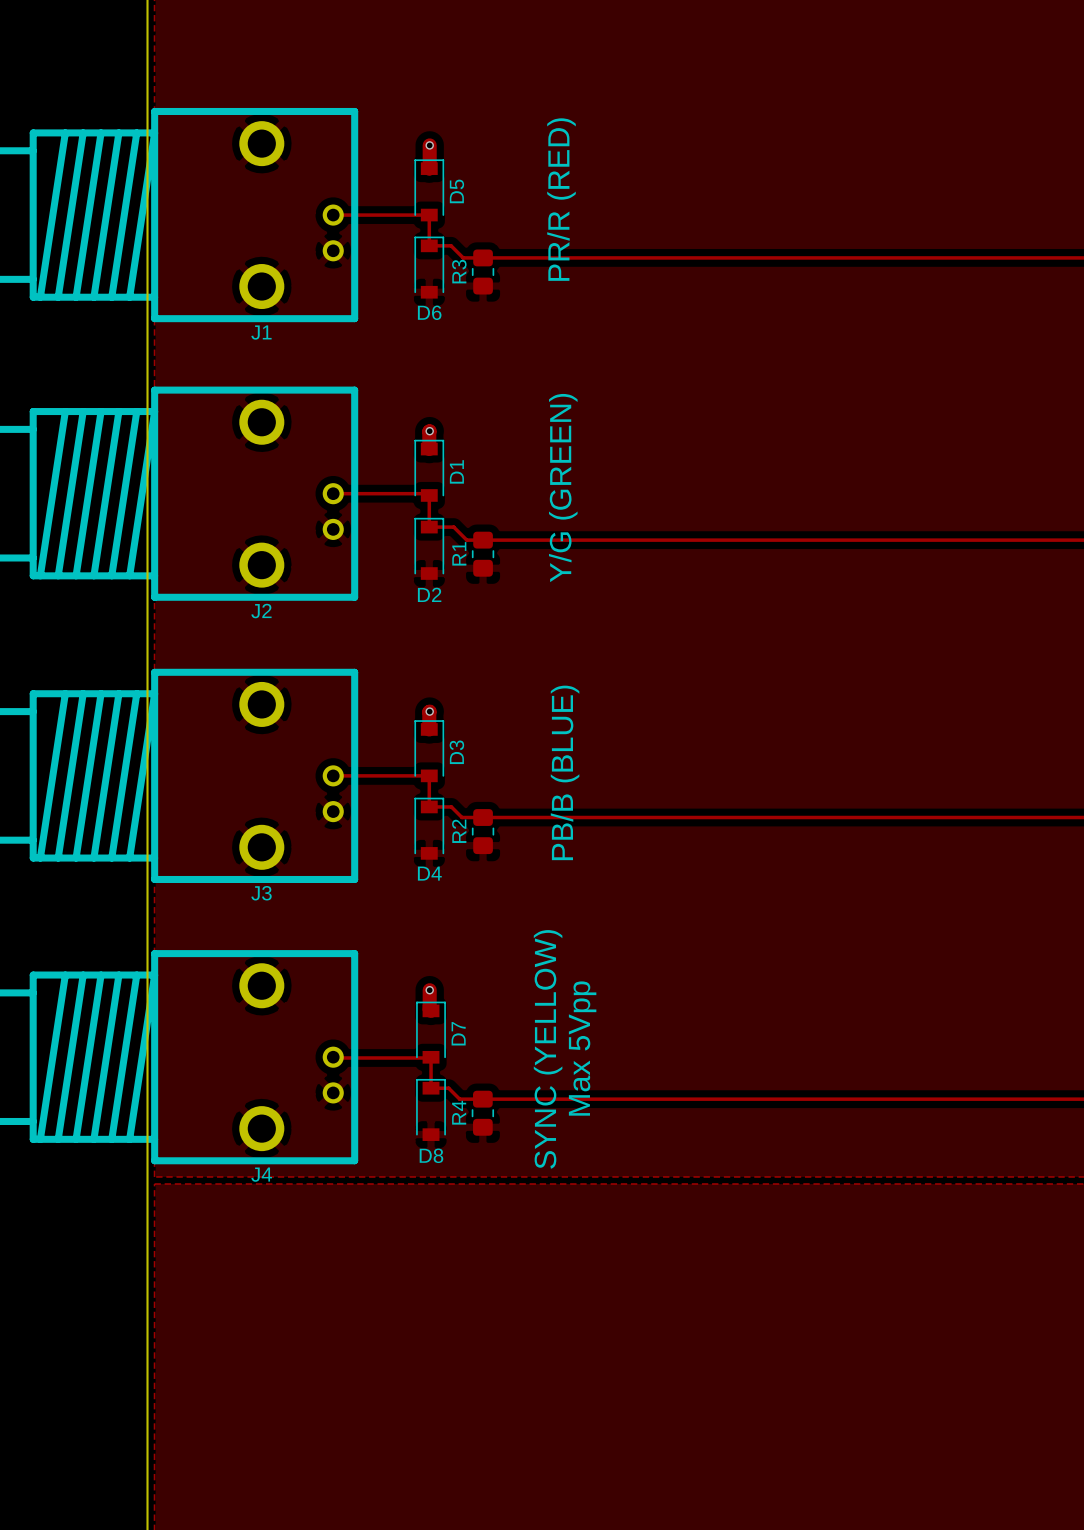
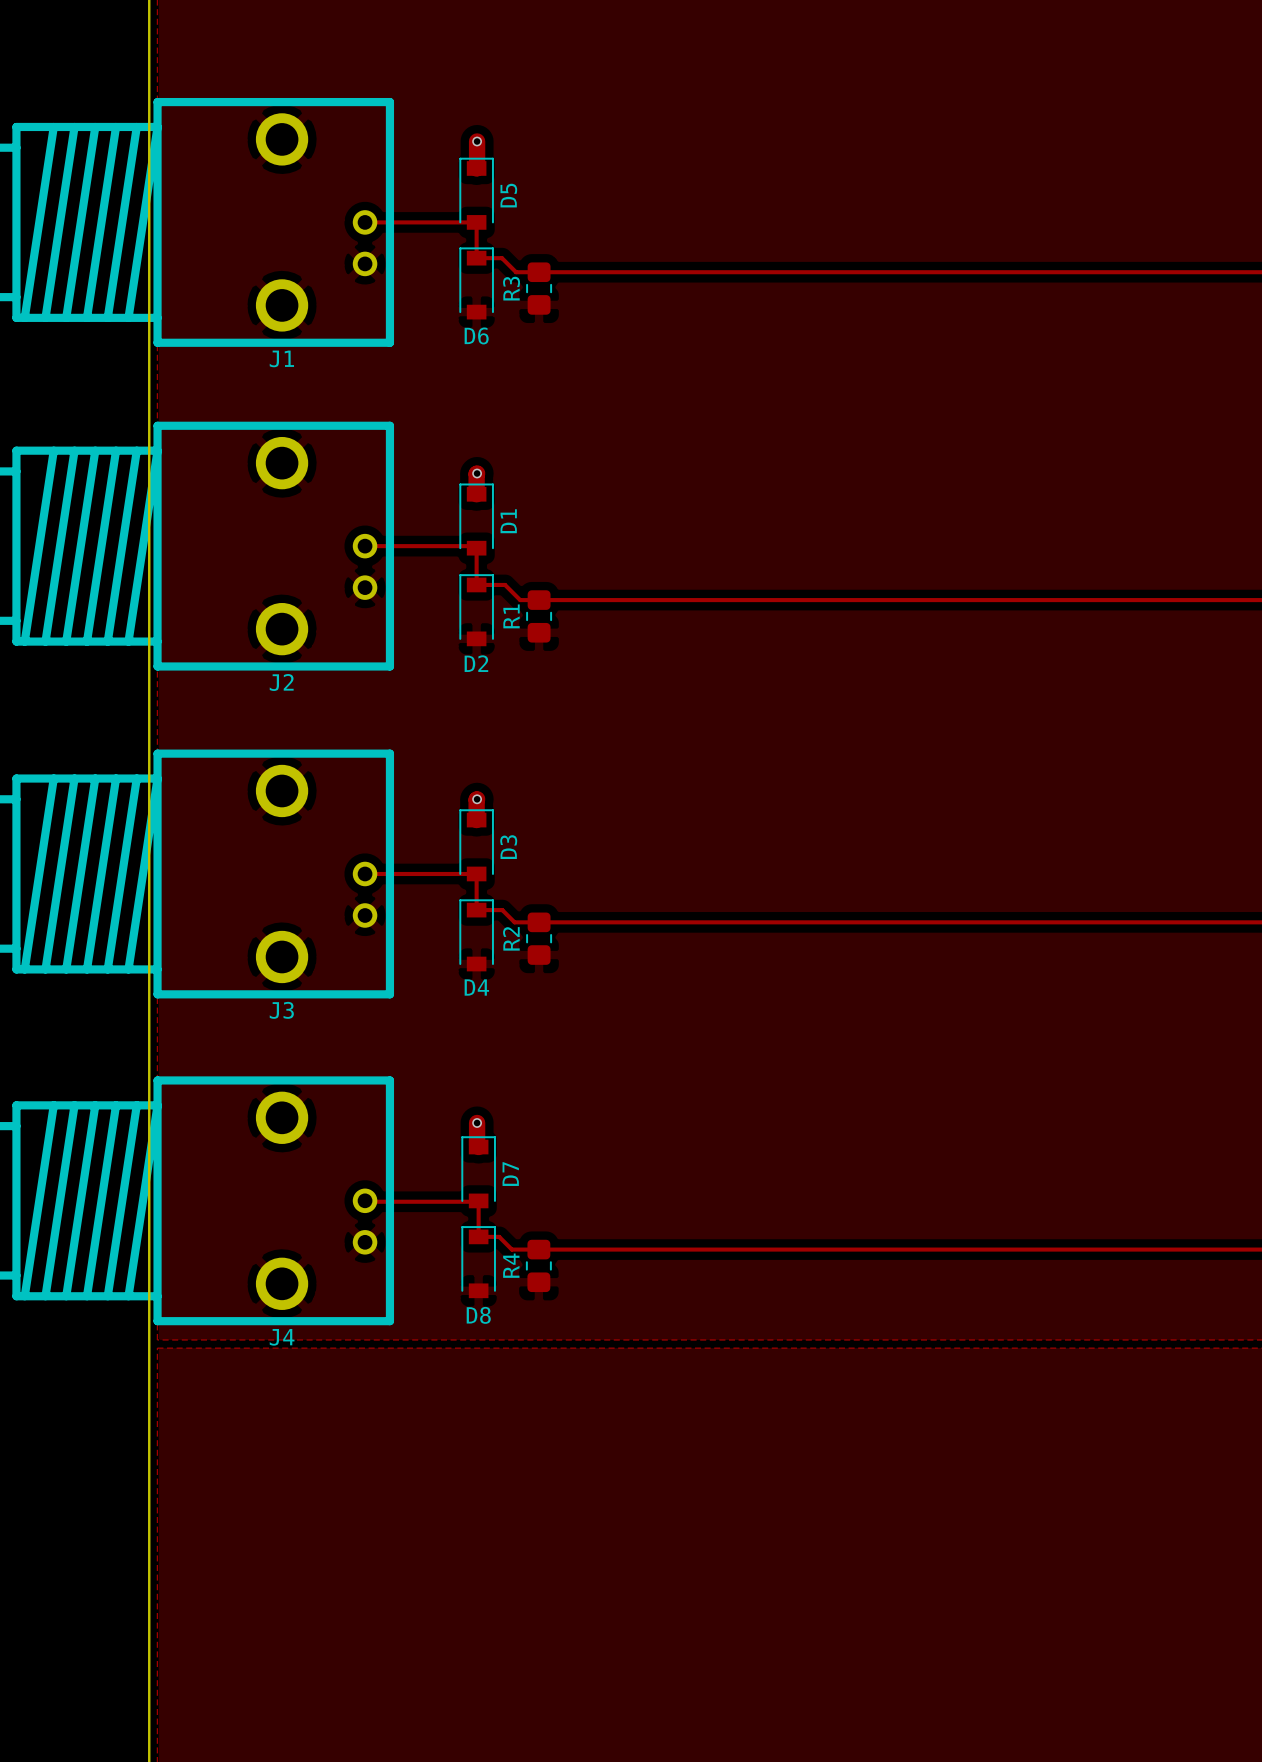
text: PR/R (RED) (561, 199) -> none
text: Y/G (GREEN) (563, 488) -> none
text: PB/B (BLUE) (565, 772) -> none
text: Max 5Vpp (582, 1048) -> none
text: SYNC (YELLOW) (548, 1049) -> none

